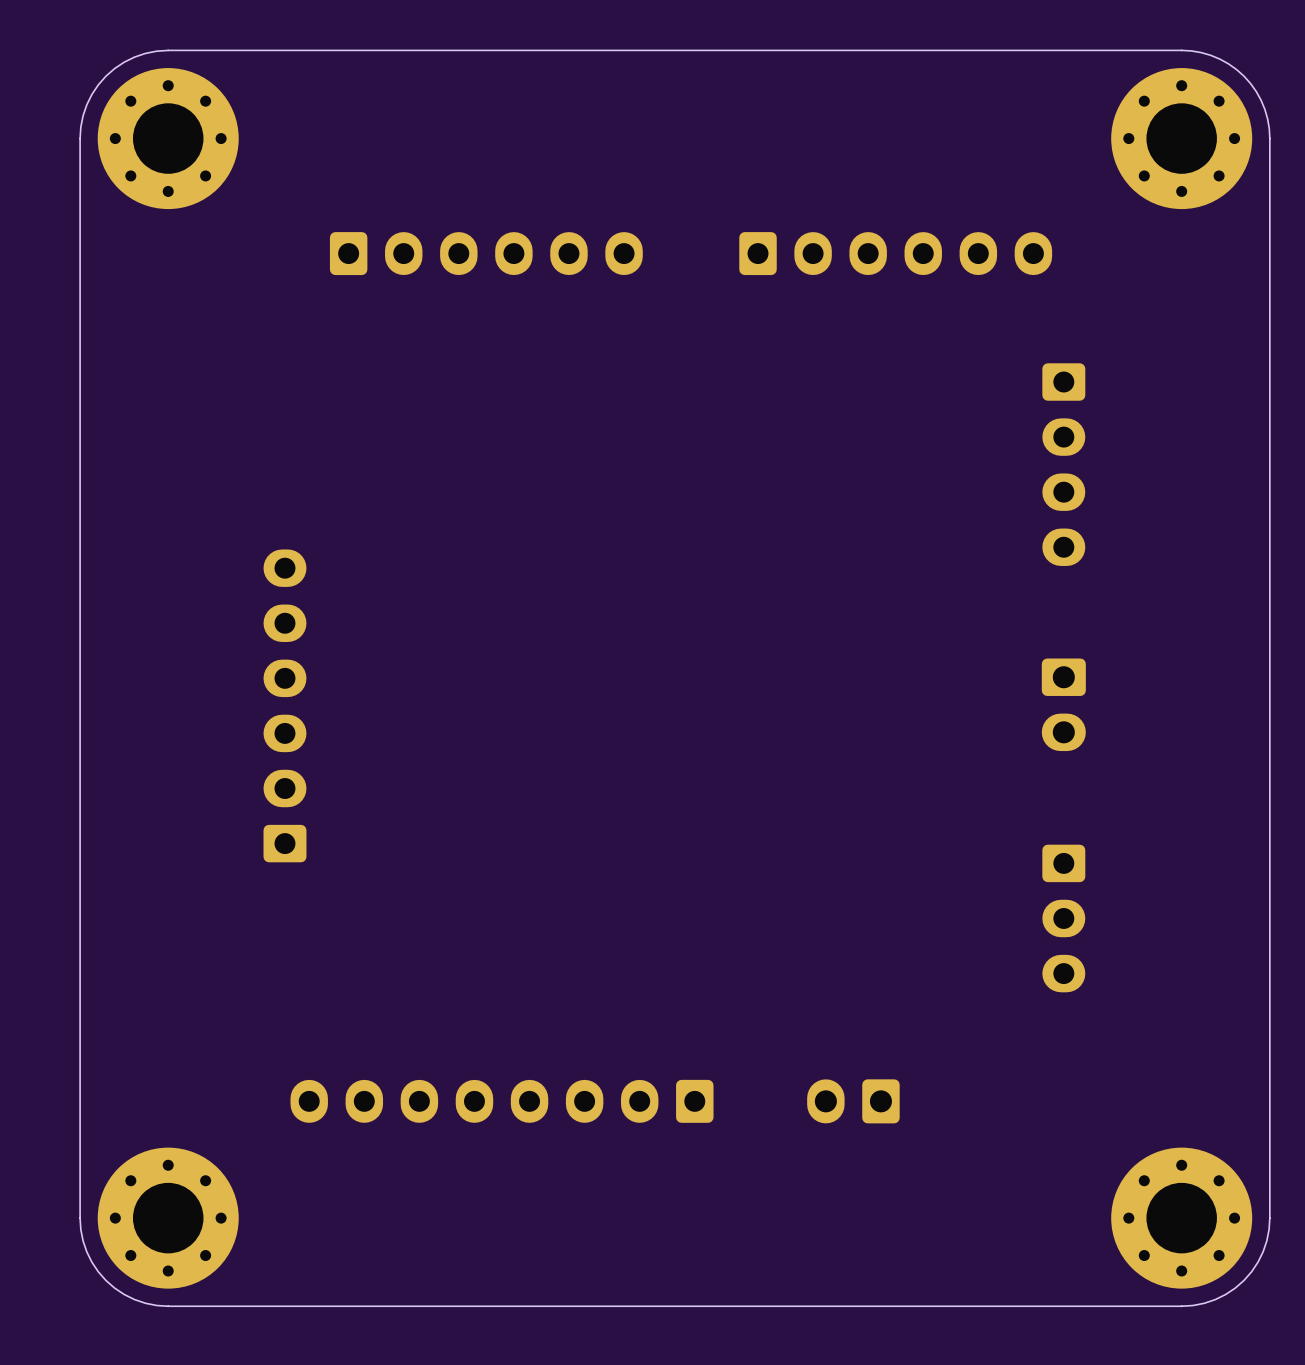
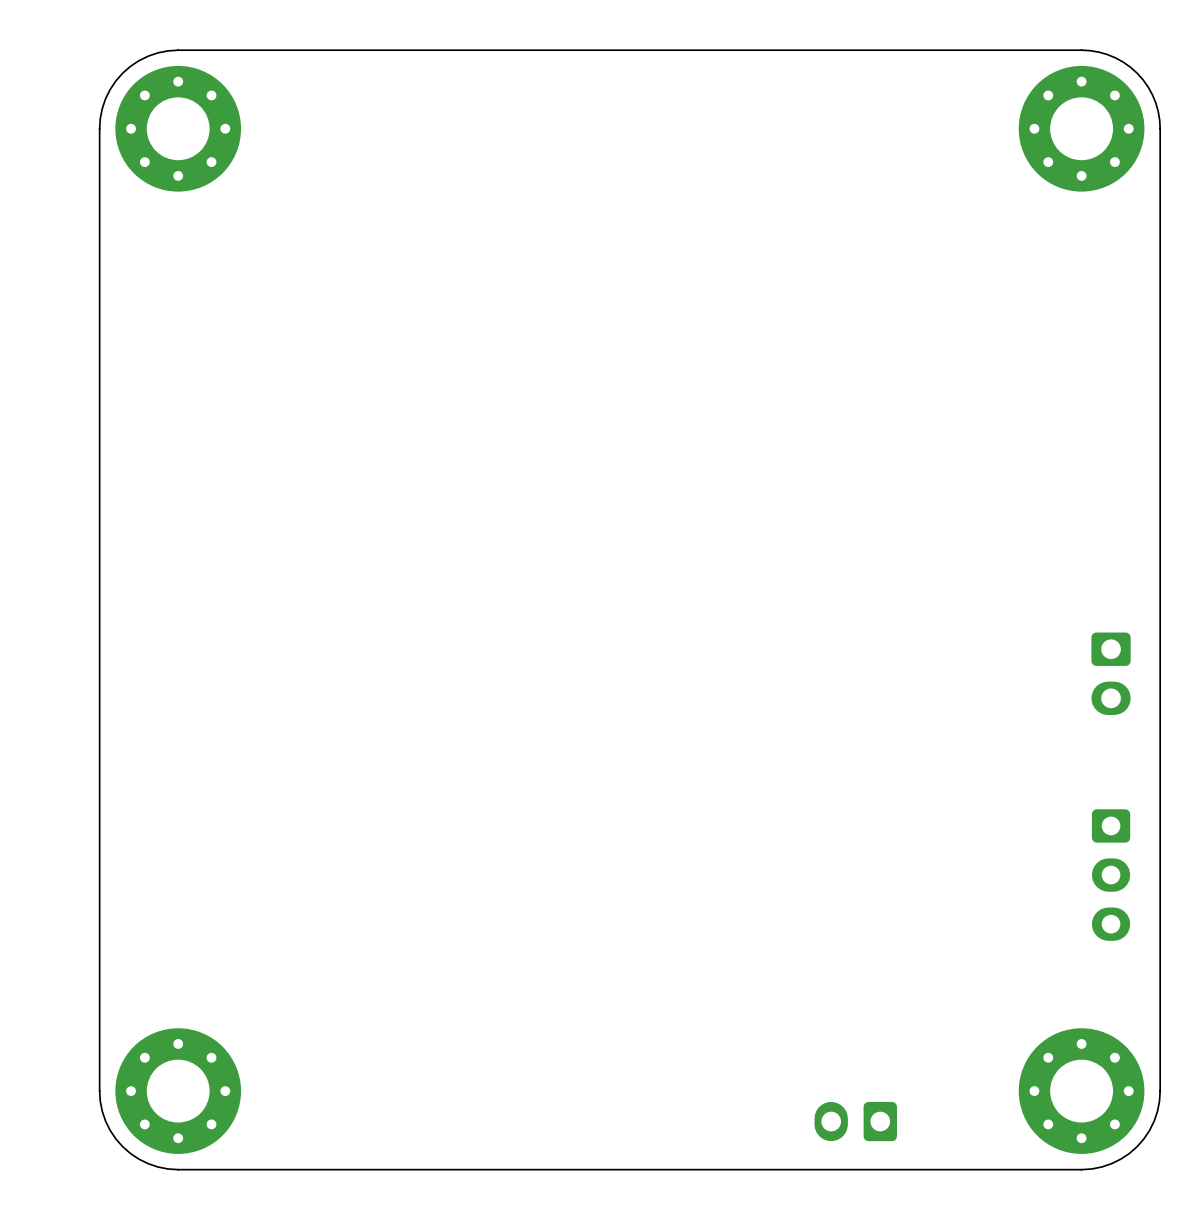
part: (486, 253) -> none
part: (895, 253) -> none
part: (1063, 464) -> none
part position: (1063, 704) -> (1111, 673)
part: (284, 705) -> none
part position: (1063, 918) -> (1111, 875)
part: (502, 1101) -> none
part position: (853, 1101) -> (855, 1121)

